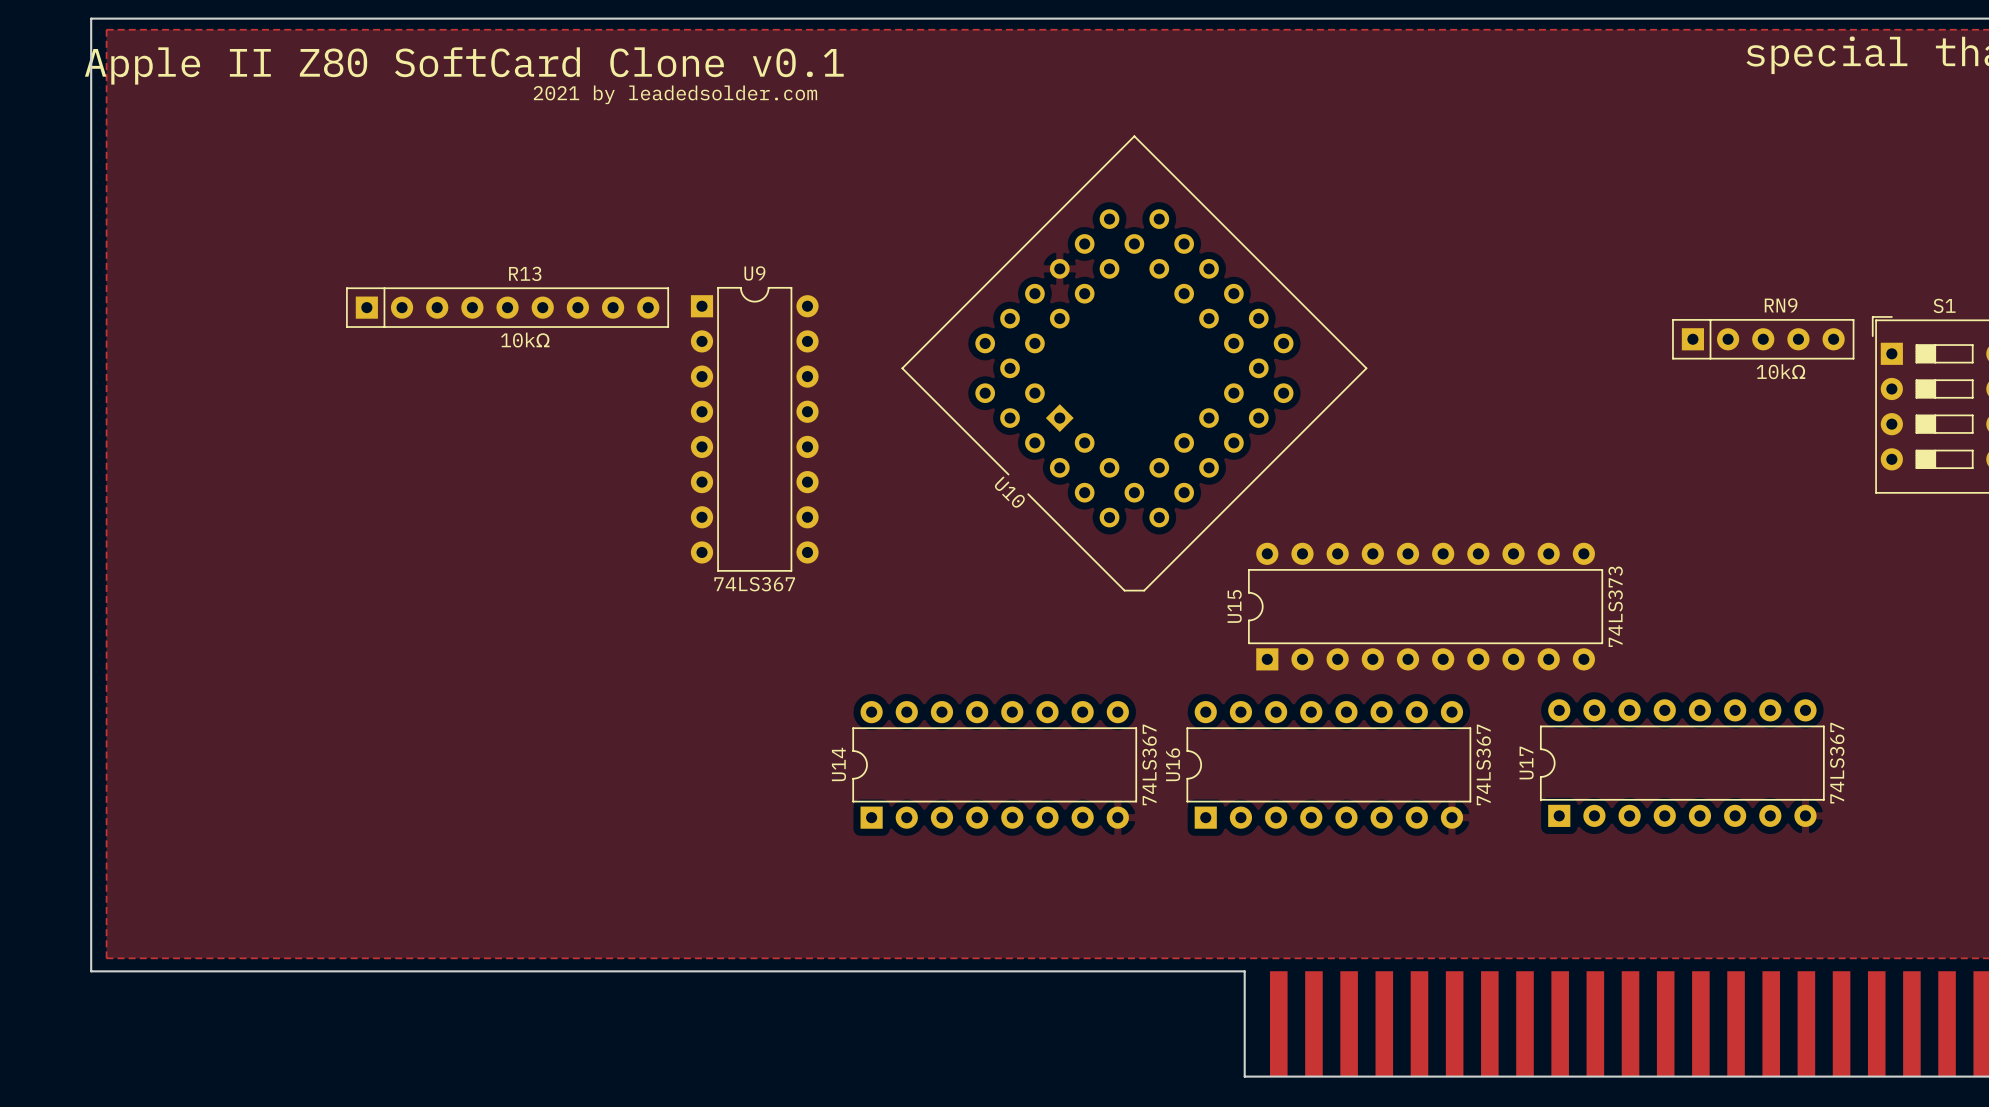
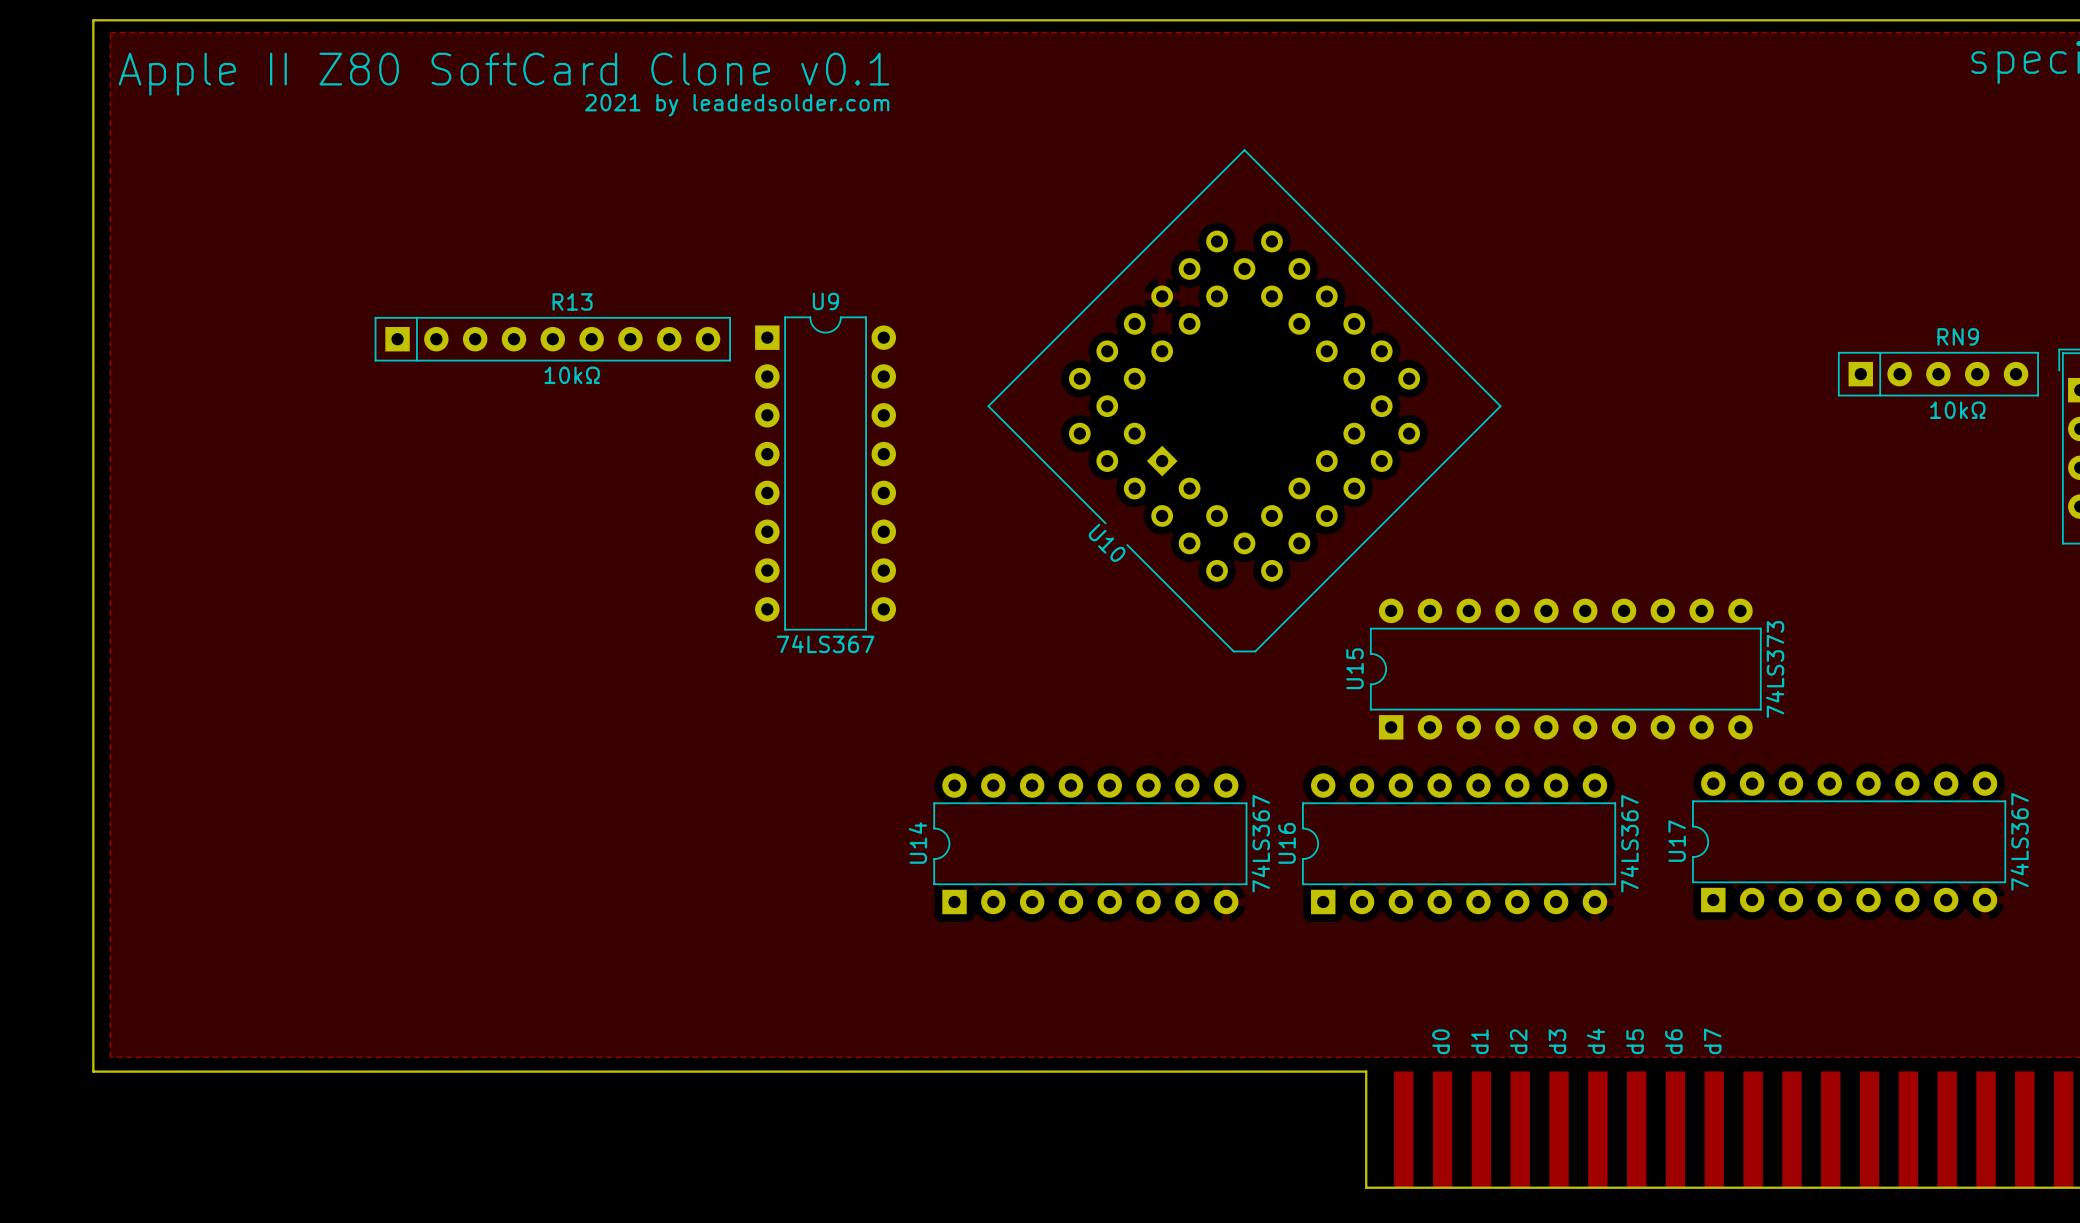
text: none -> d0 (1441, 1041)
text: none -> d1 (1479, 1041)
text: none -> d2 (1518, 1041)
text: none -> d3 (1557, 1041)
text: none -> d4 (1595, 1041)
text: none -> d5 (1635, 1041)
text: none -> d6 (1673, 1041)
text: none -> d7 (1712, 1041)

